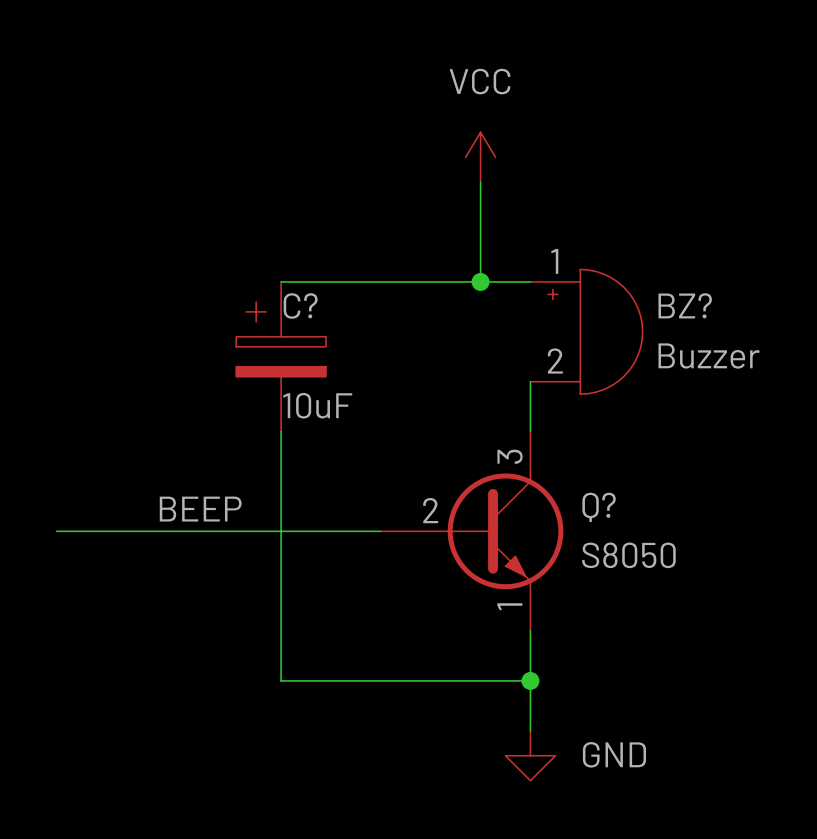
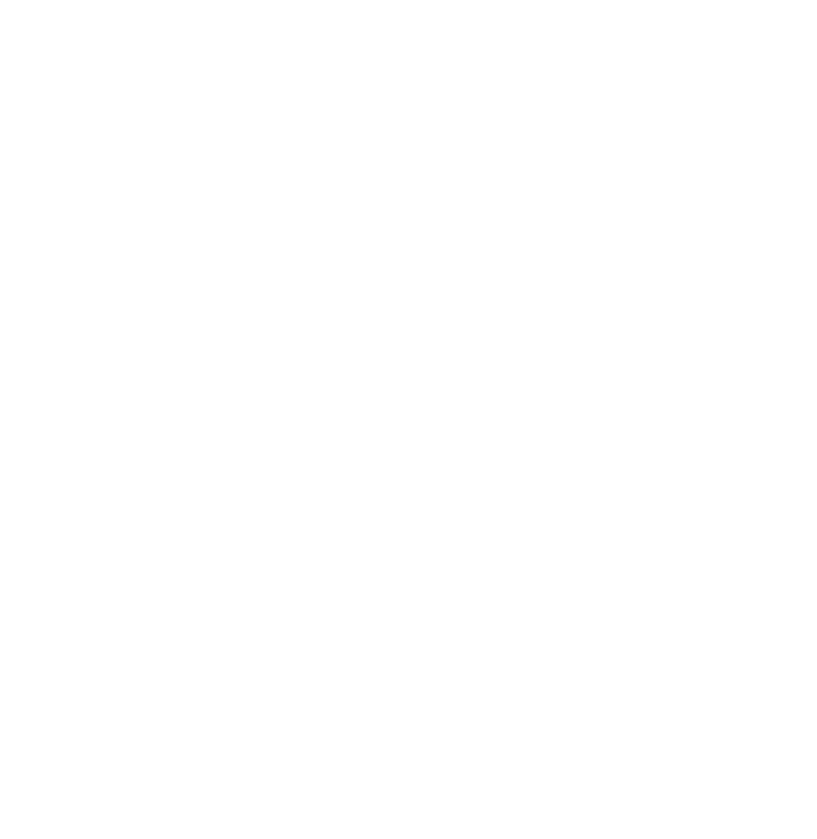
power symbol: VCC (480, 157) -> none
wire: (480, 182) (480, 281) -> none
wire: (281, 281) (530, 281) -> none
junction: (480, 281) -> none
BZ?: Buzzer (586, 331) -> none
C?: 10uF (281, 356) -> none
wire: (530, 381) (530, 431) -> none
wire: (281, 431) (281, 680) (530, 680) -> none
label: BEEP (200, 509) -> none
wire: (56, 531) (380, 531) -> none
Q?: S8050 (472, 531) -> none
wire: (530, 631) (530, 730) -> none
junction: (530, 680) -> none
power symbol: GND (530, 755) -> none

